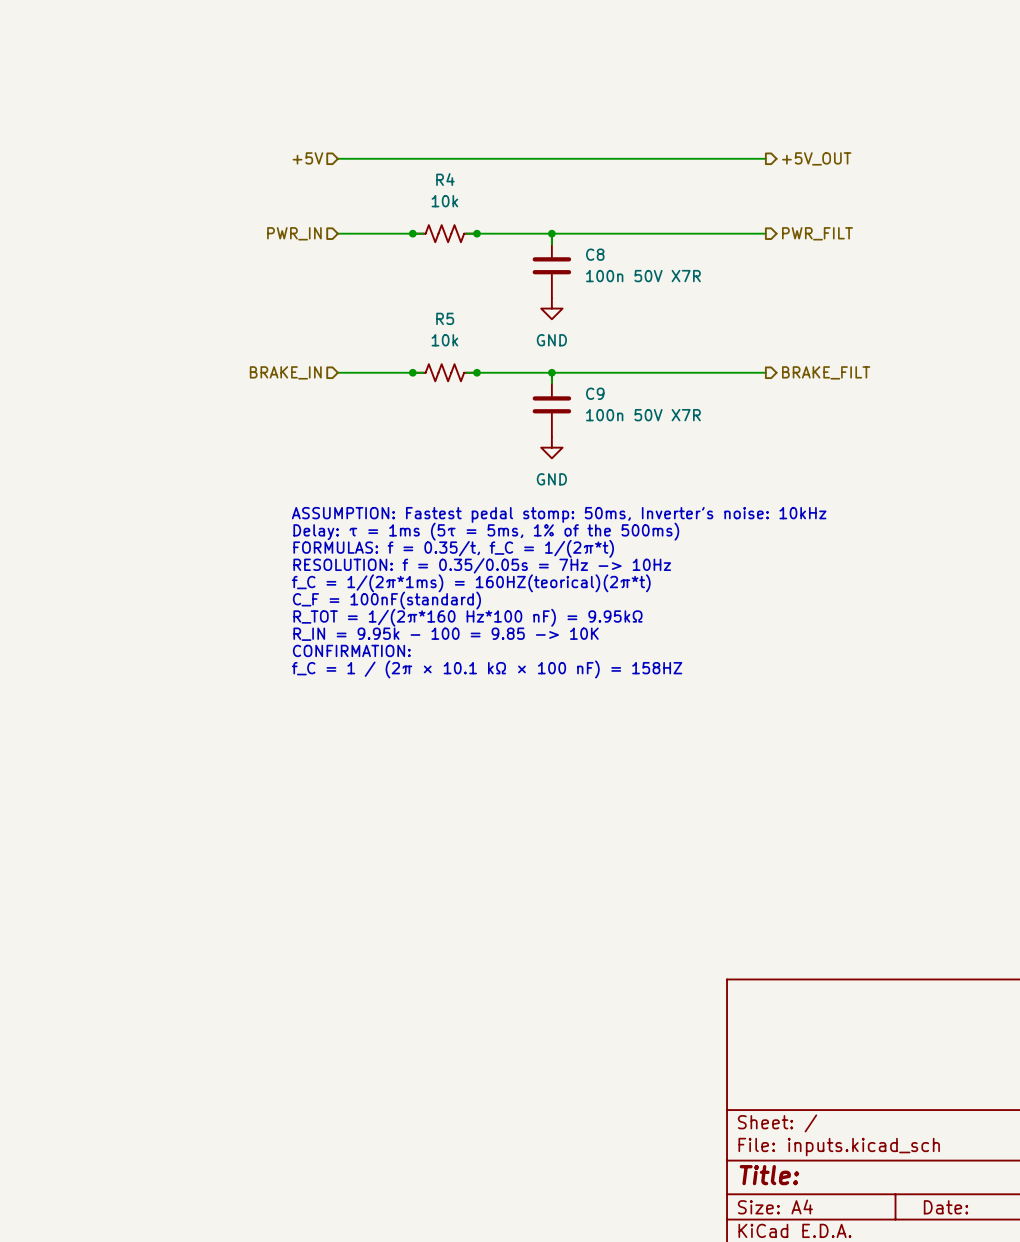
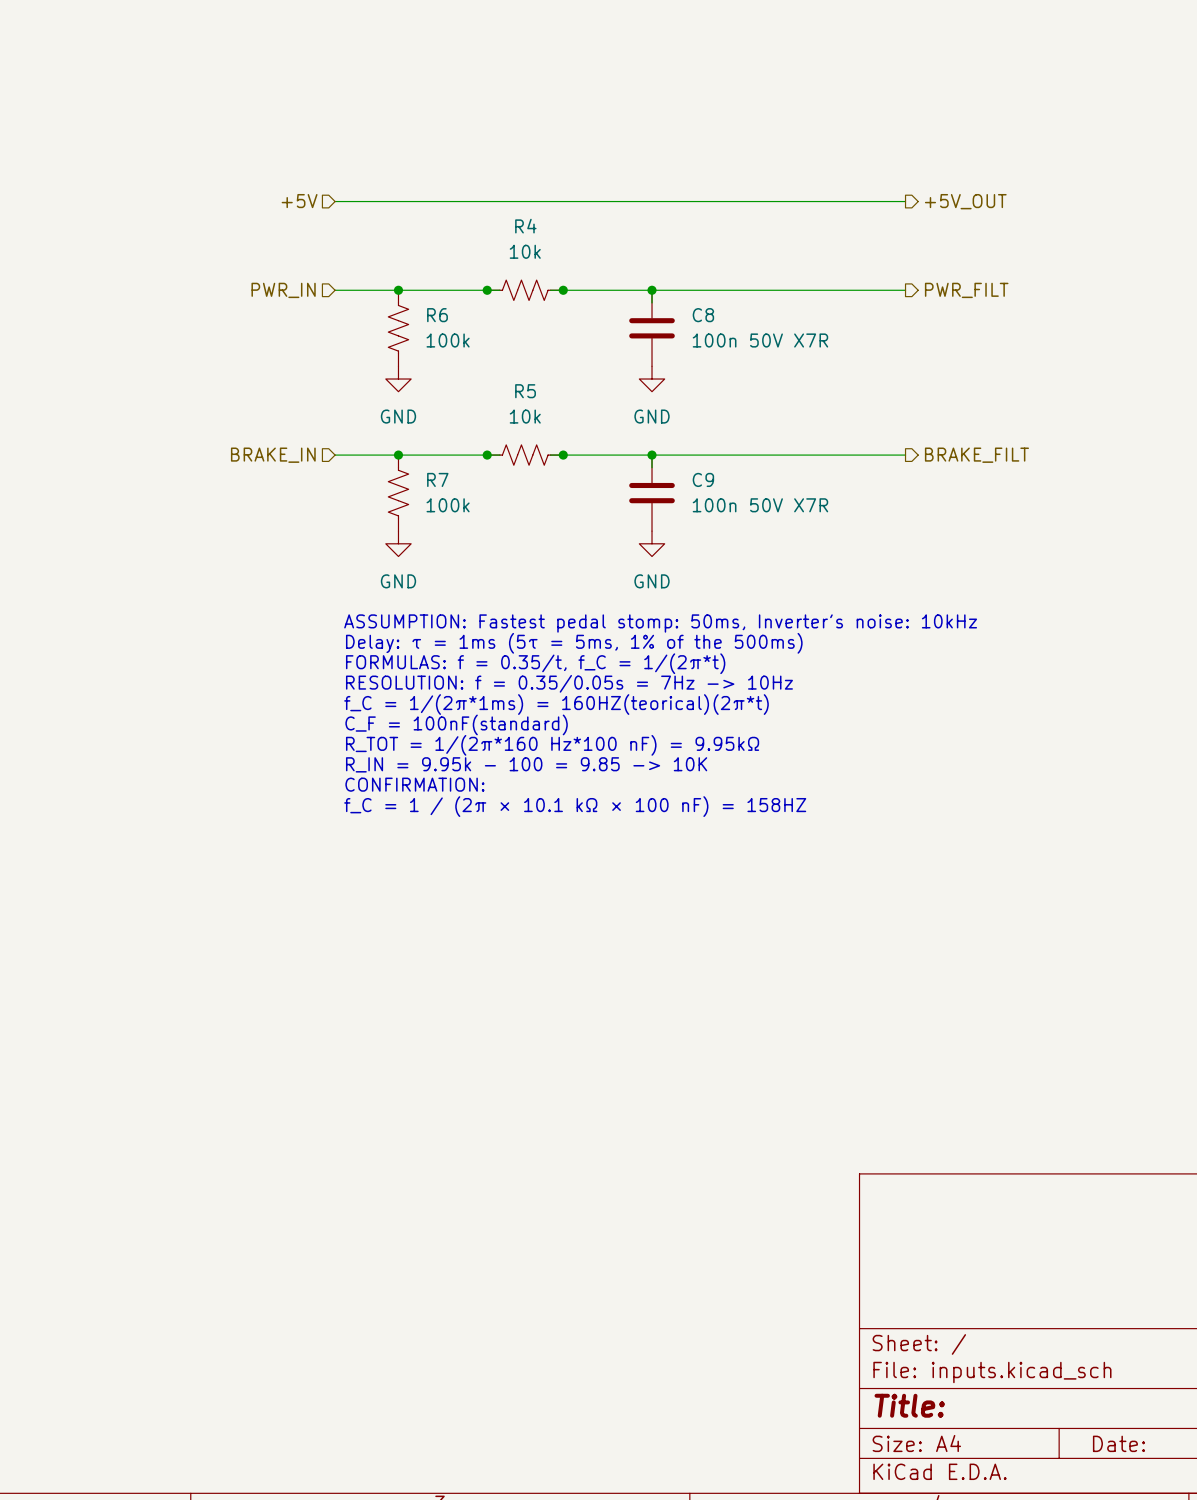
wire: none -> (335, 201) (398, 201)
hierarchical label position: +5V (307, 158) -> +5V (299, 201)
wire: none -> (335, 290) (398, 290)
hierarchical label position: PWR_IN (294, 233) -> PWR_IN (283, 290)
junction: none -> (398, 290)
R6: none -> 100k (398, 328)
power symbol: none -> GND (398, 379)
wire: none -> (335, 455) (398, 455)
hierarchical label position: BRAKE_IN (285, 372) -> BRAKE_IN (273, 455)
junction: none -> (398, 455)
R7: none -> 100k (398, 493)
power symbol: none -> GND (398, 543)

